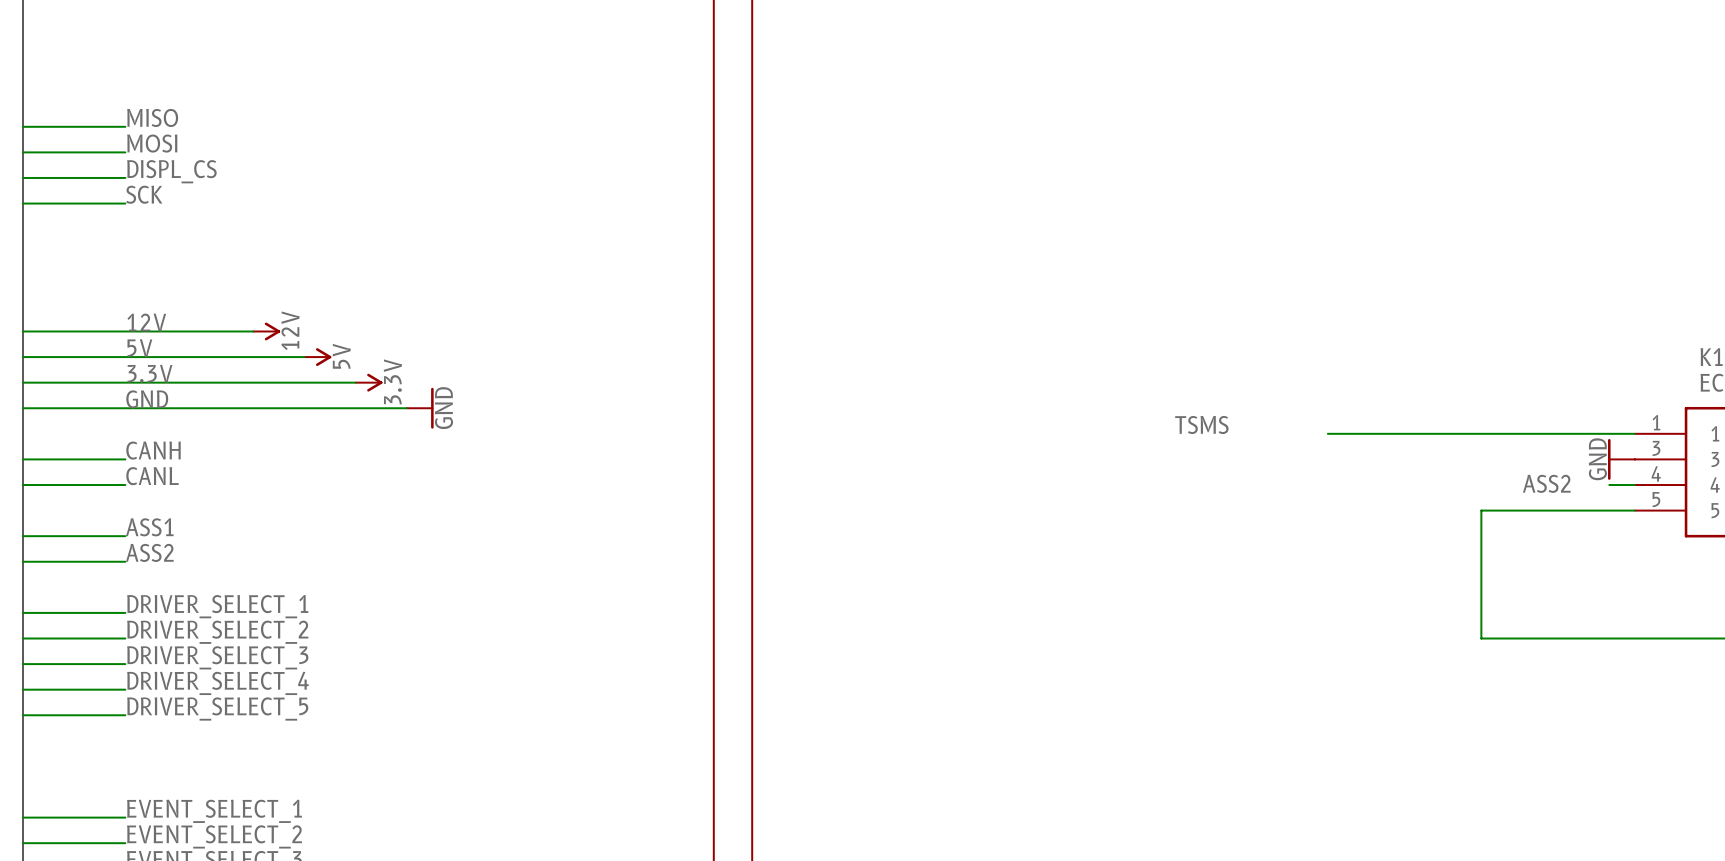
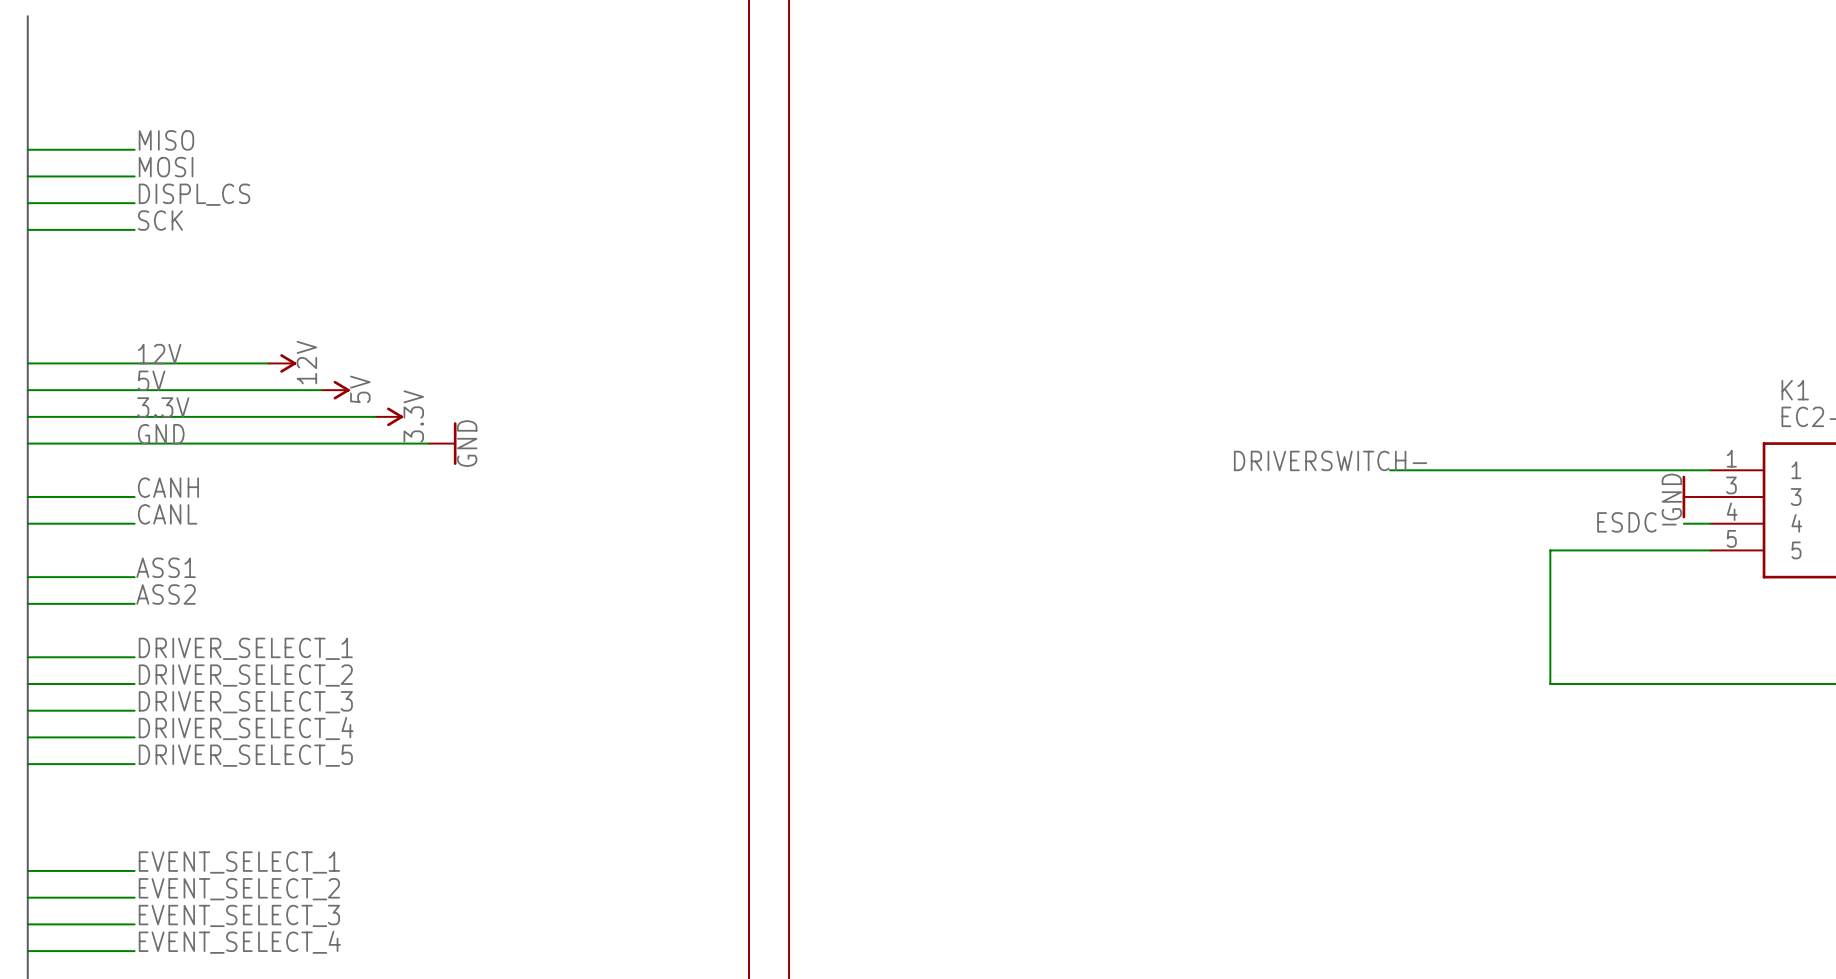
label: TSMS (1201, 424) -> DRIVERSWITCH- (1330, 460)
label: ASS2 (1546, 483) -> ESDC- (1636, 522)

